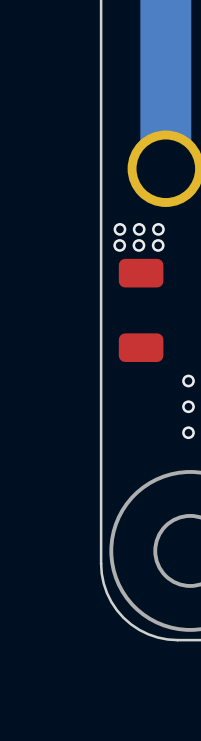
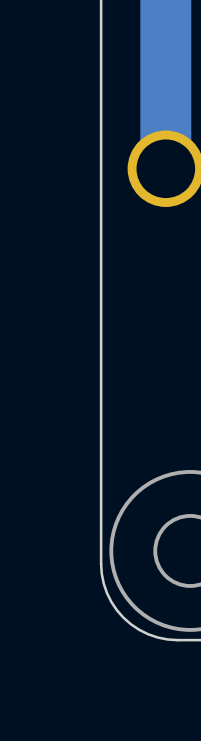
via: (119, 229) -> none
via: (139, 229) -> none
via: (158, 229) -> none
via: (119, 245) -> none
via: (138, 245) -> none
via: (158, 245) -> none
part: (141, 310) -> none
via: (188, 381) -> none
via: (188, 406) -> none
via: (188, 432) -> none

